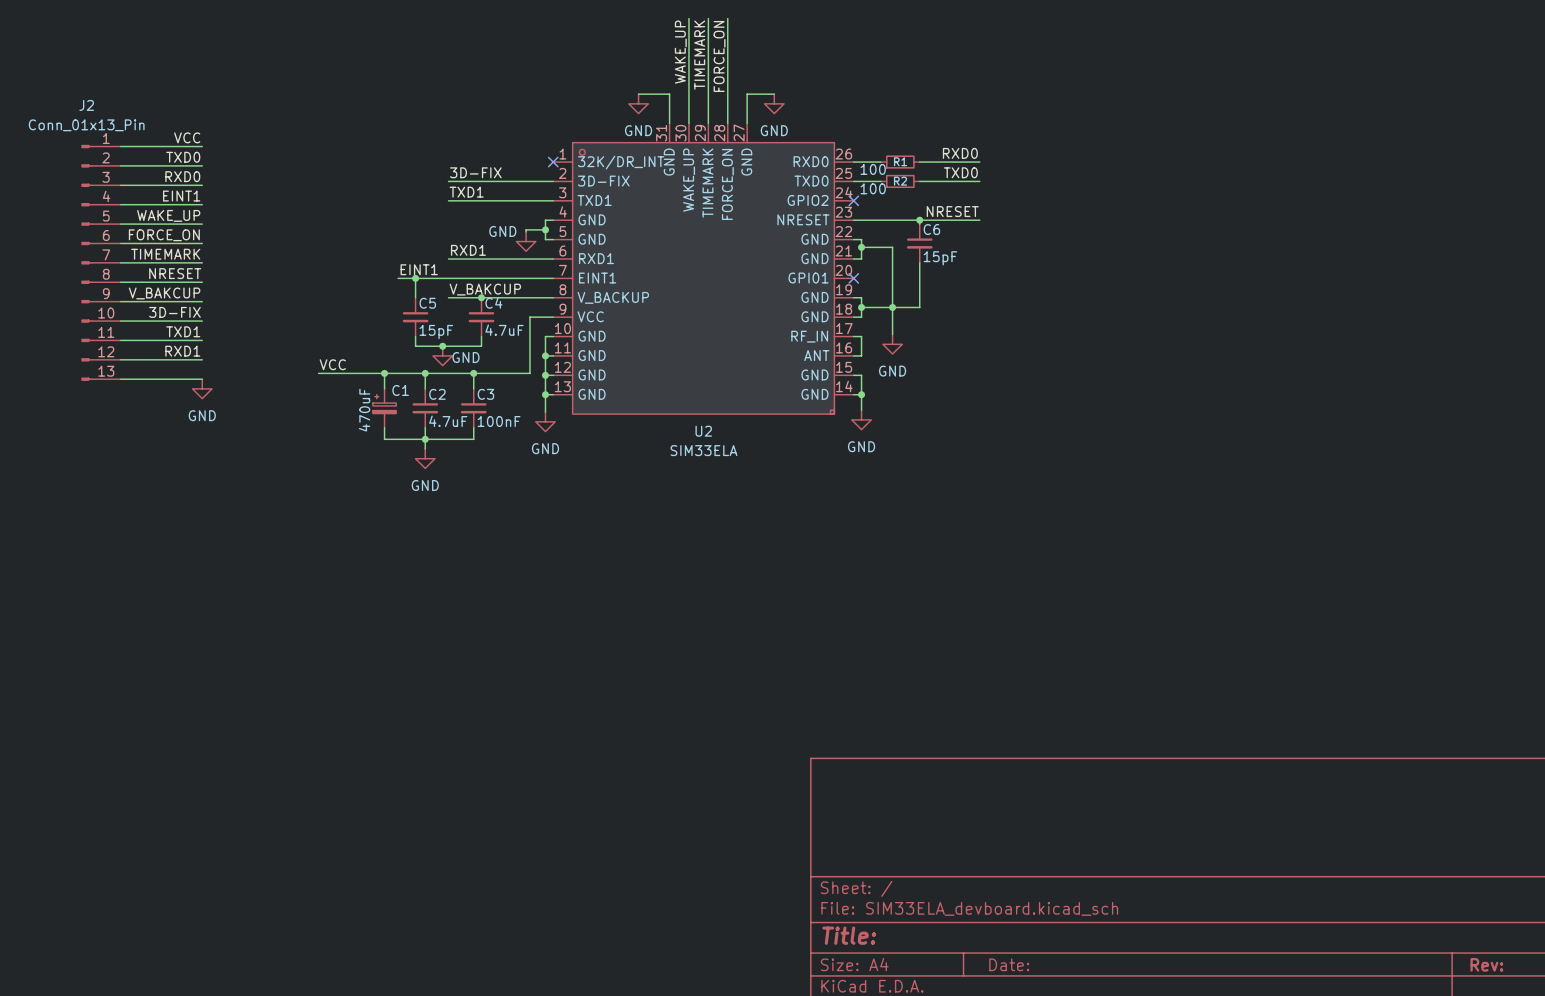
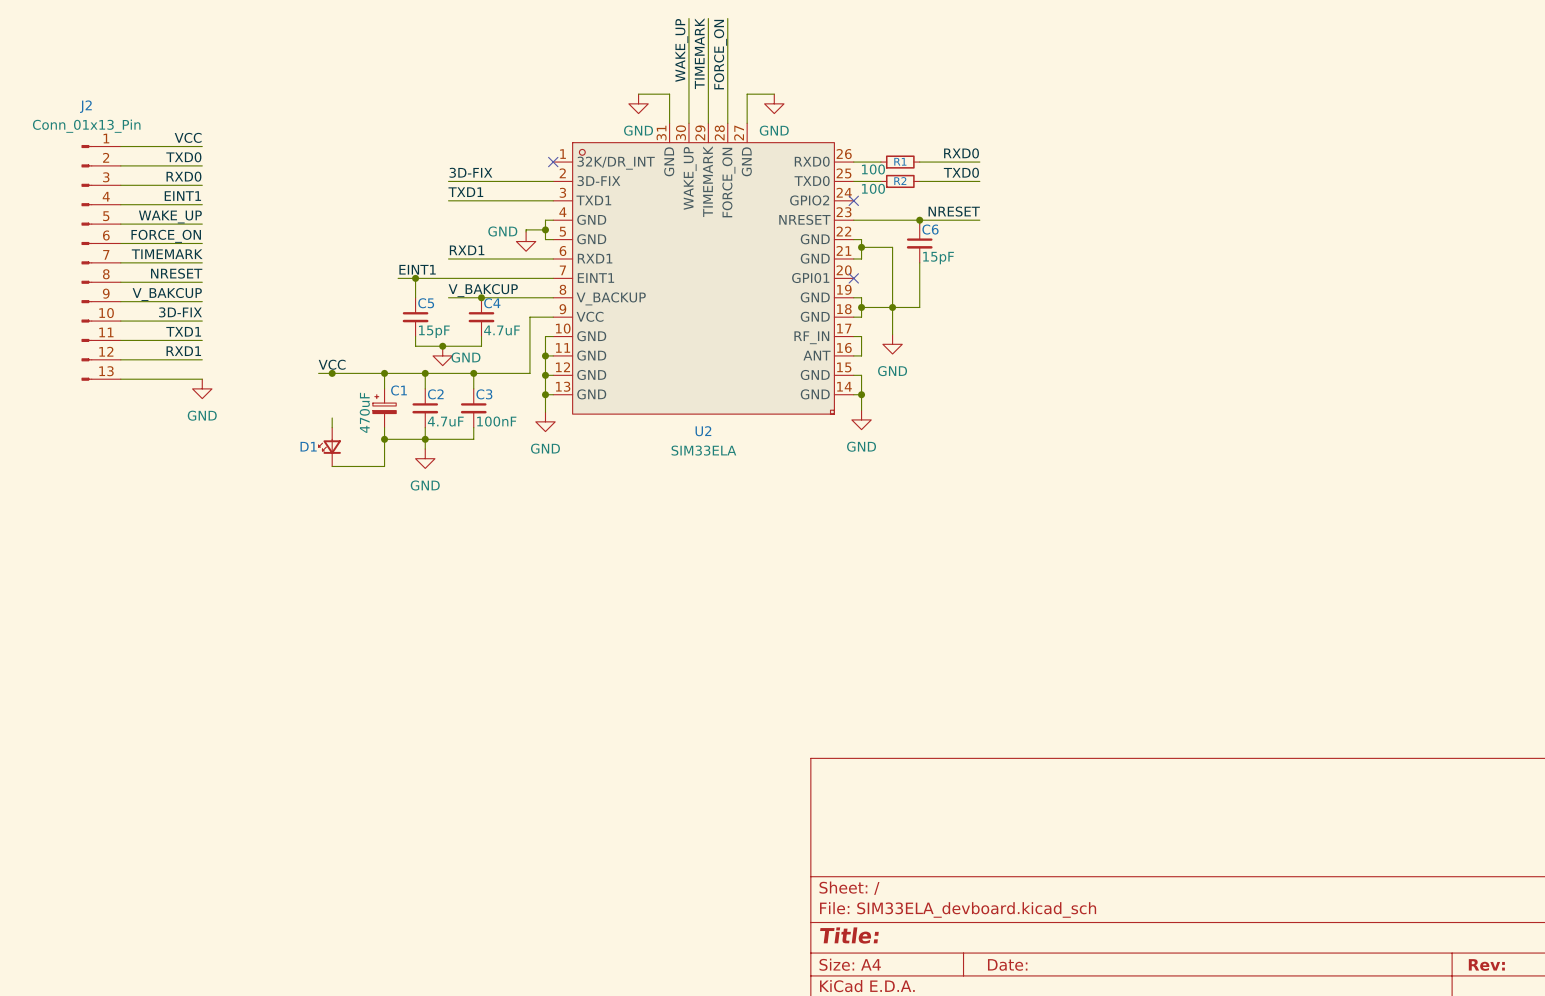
junction: none -> (332, 373)
wire: none -> (332, 417) (332, 427)
wire: none -> (384, 439) (384, 466) (332, 466)
junction: none -> (384, 439)
D1: none -> (329, 447)

